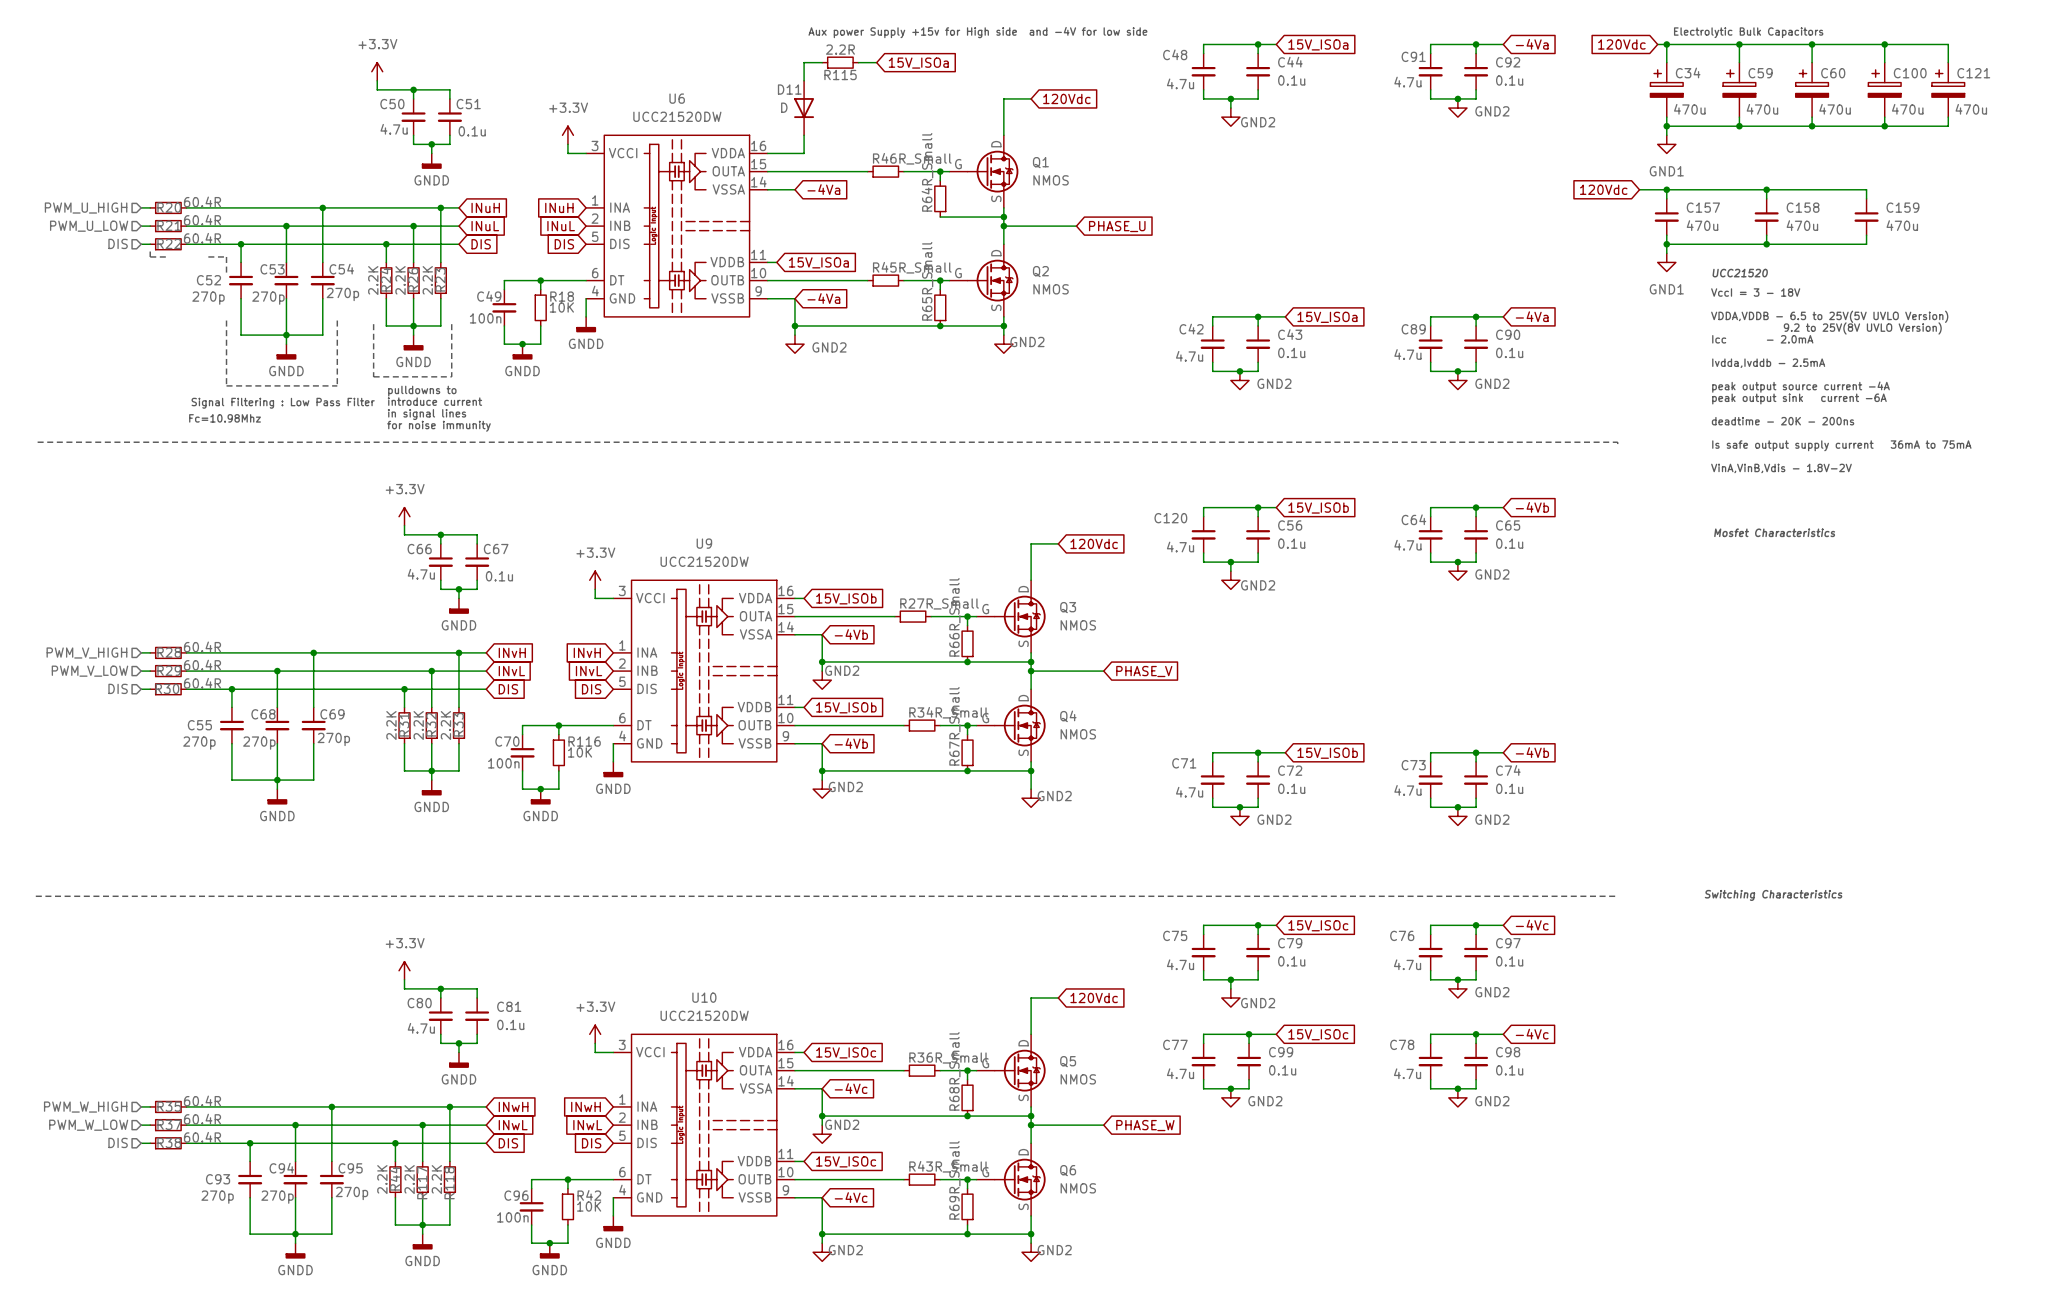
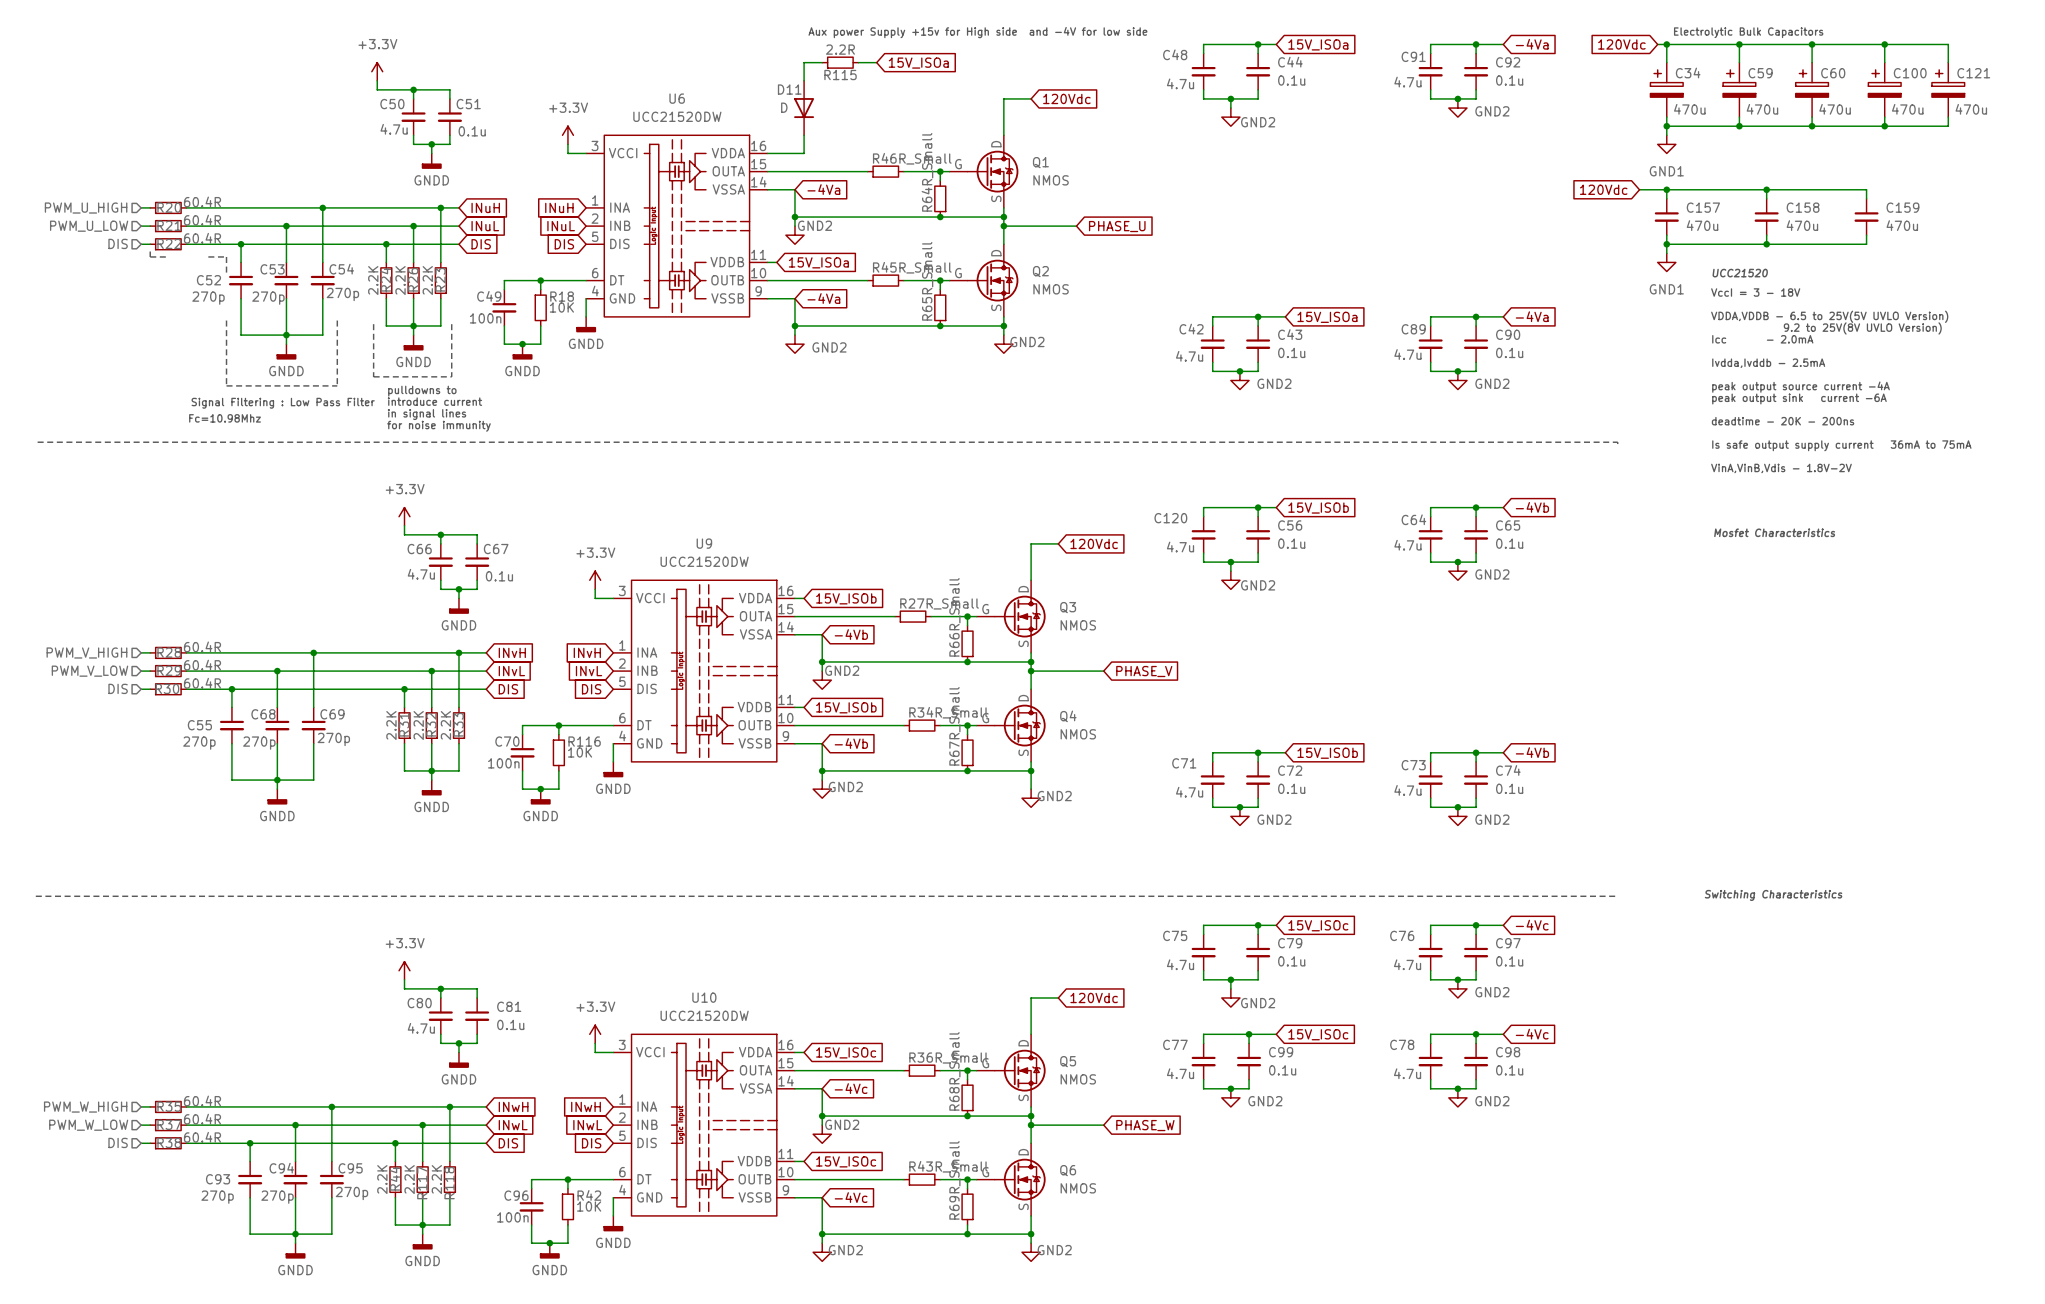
wire: none -> (794, 189) (794, 226)
wire: none -> (794, 217) (940, 217)
junction: none -> (794, 217)
junction: none -> (940, 217)
power symbol: none -> GND2 (794, 235)

